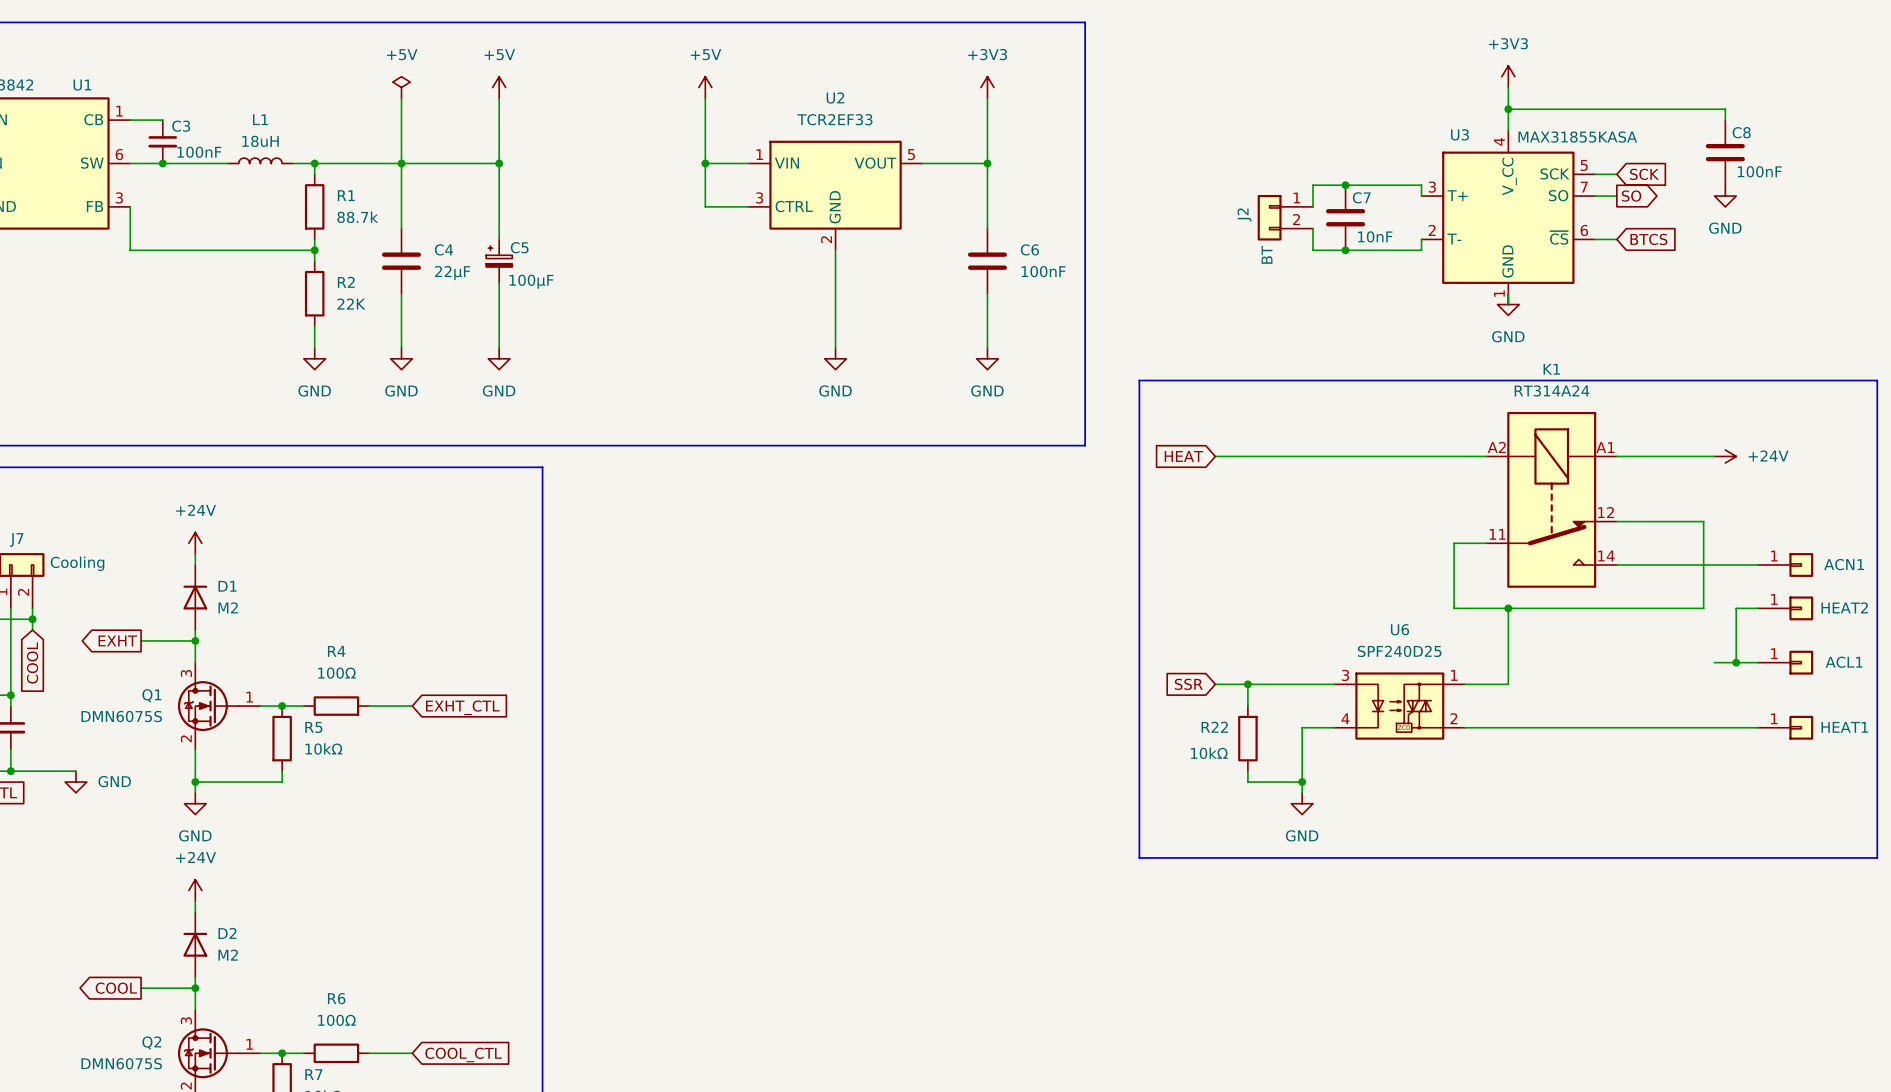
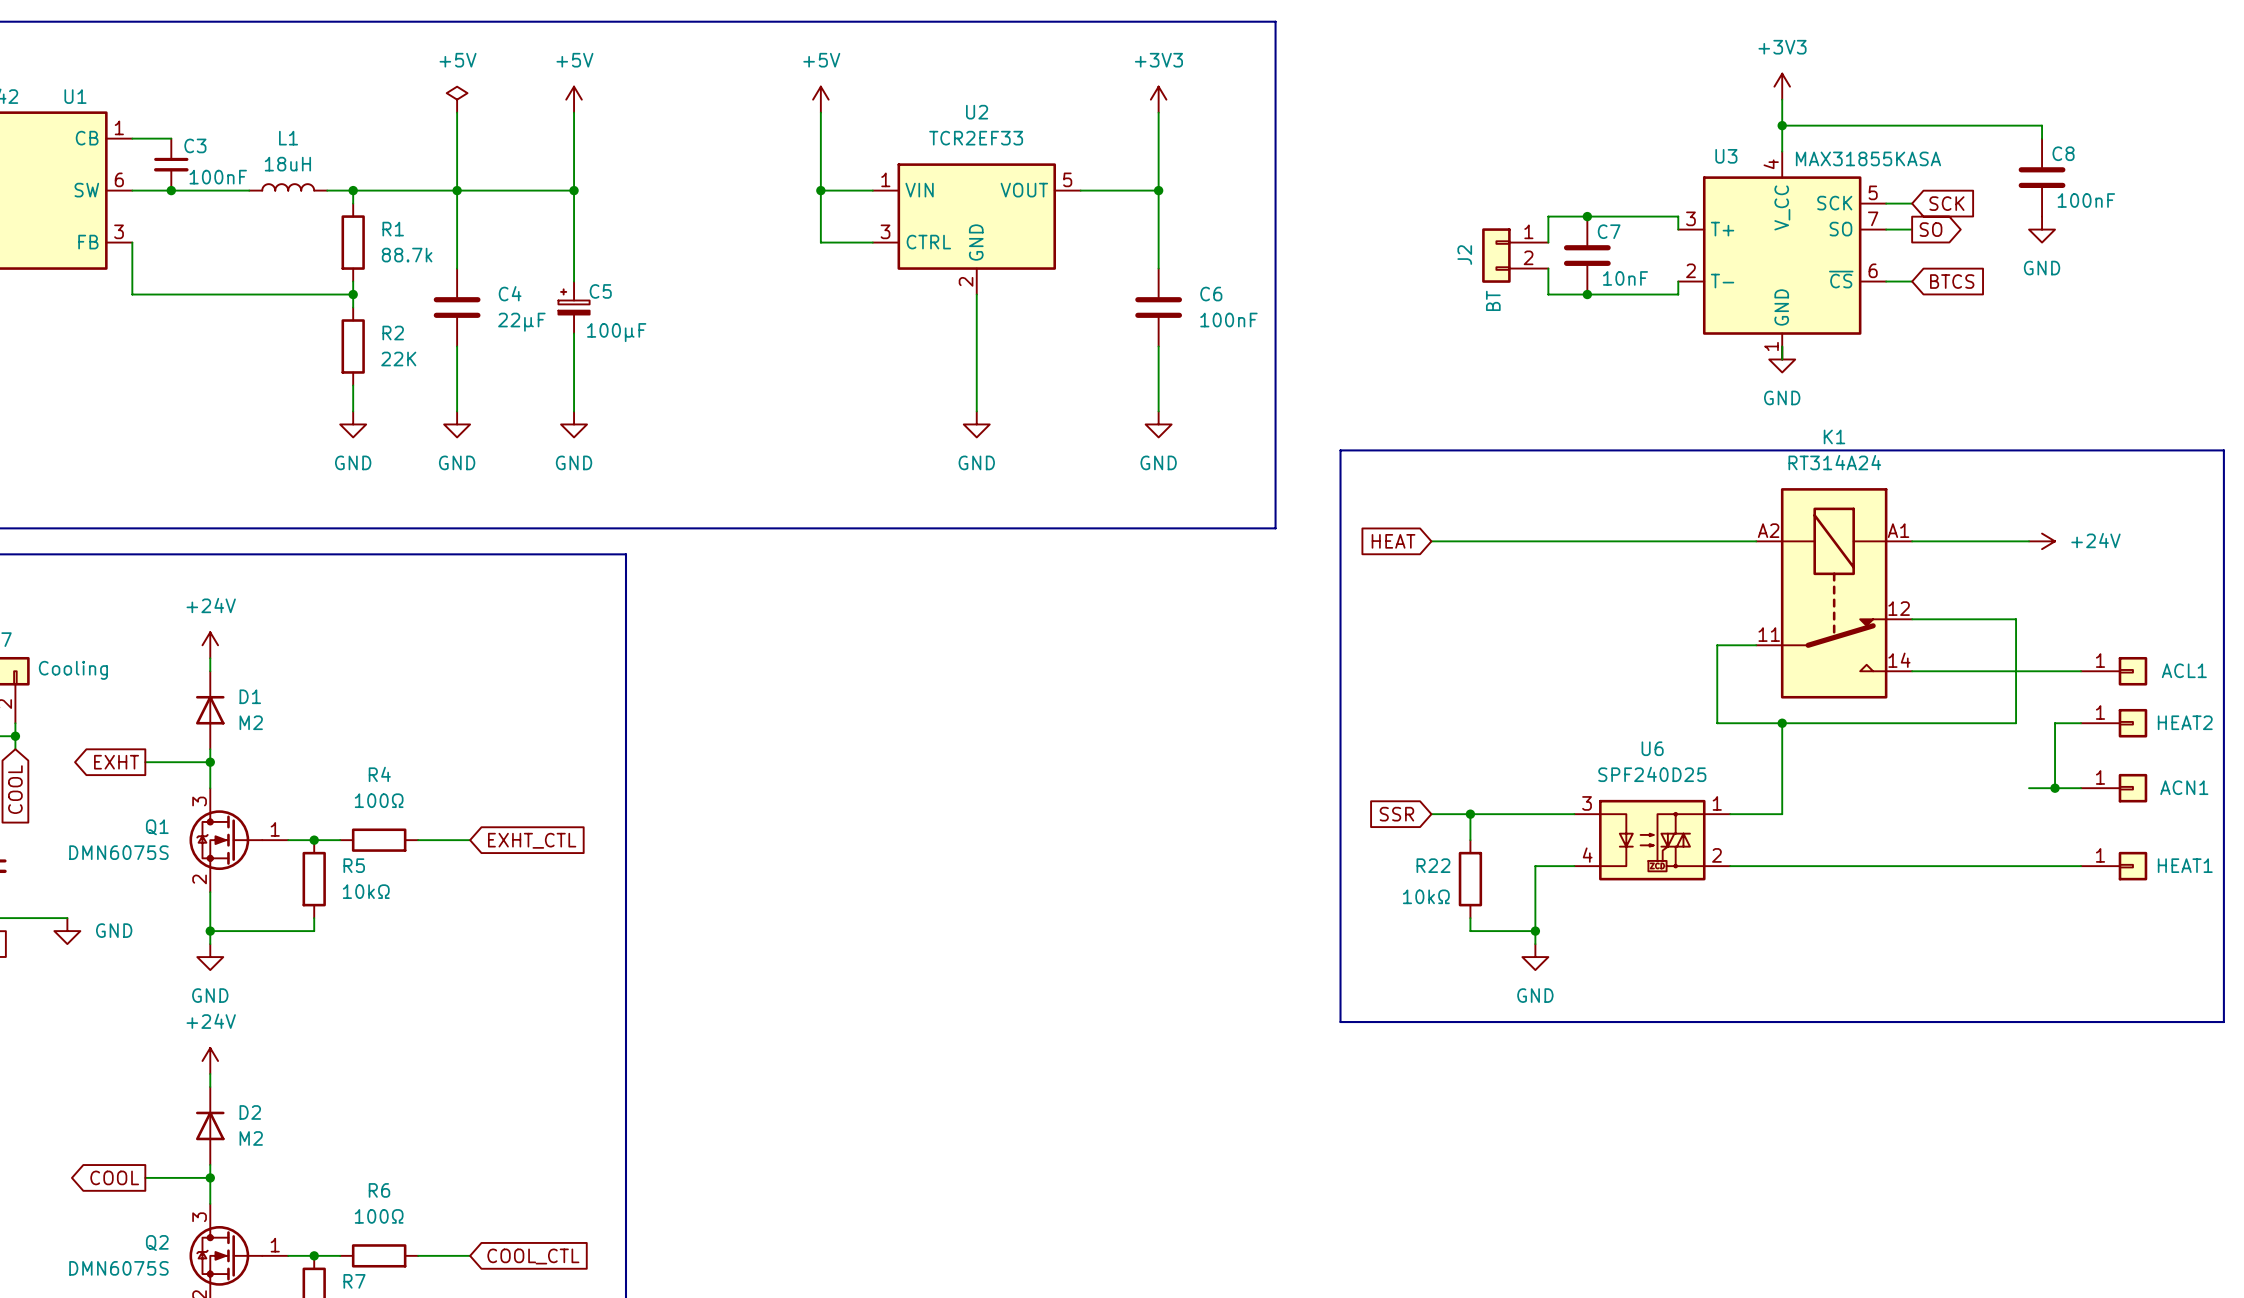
ACN1 name: ACN1 (1844, 564) -> ACL1 (2184, 670)
ACL1 name: ACL1 (1844, 662) -> ACN1 (2184, 787)

